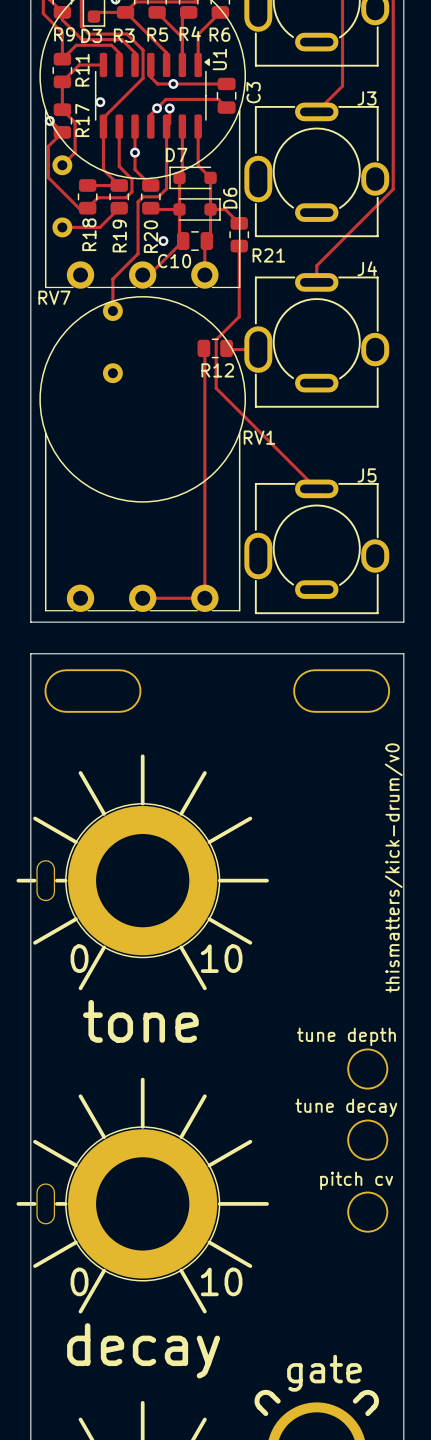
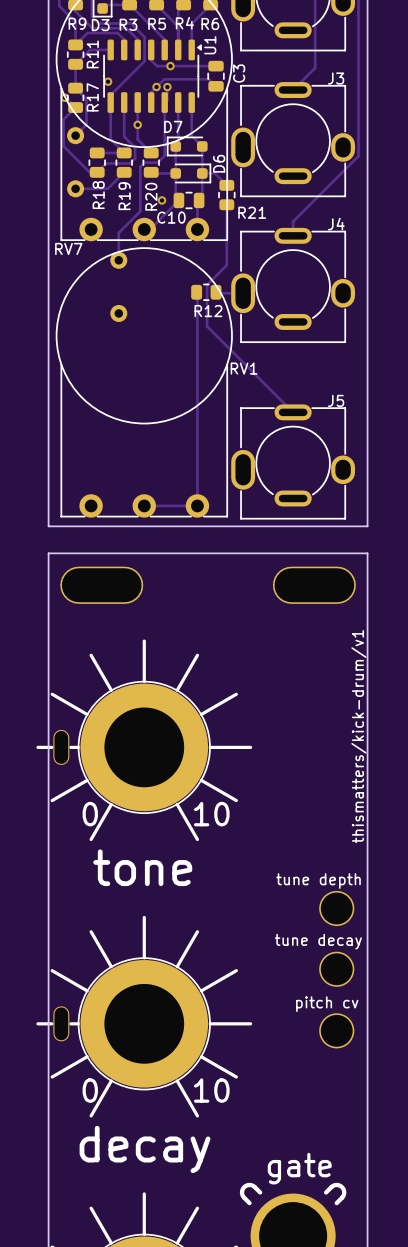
text: thismatters/kick-drum/v0 (393, 868) -> thismatters/kick-drum/v1 (358, 736)

